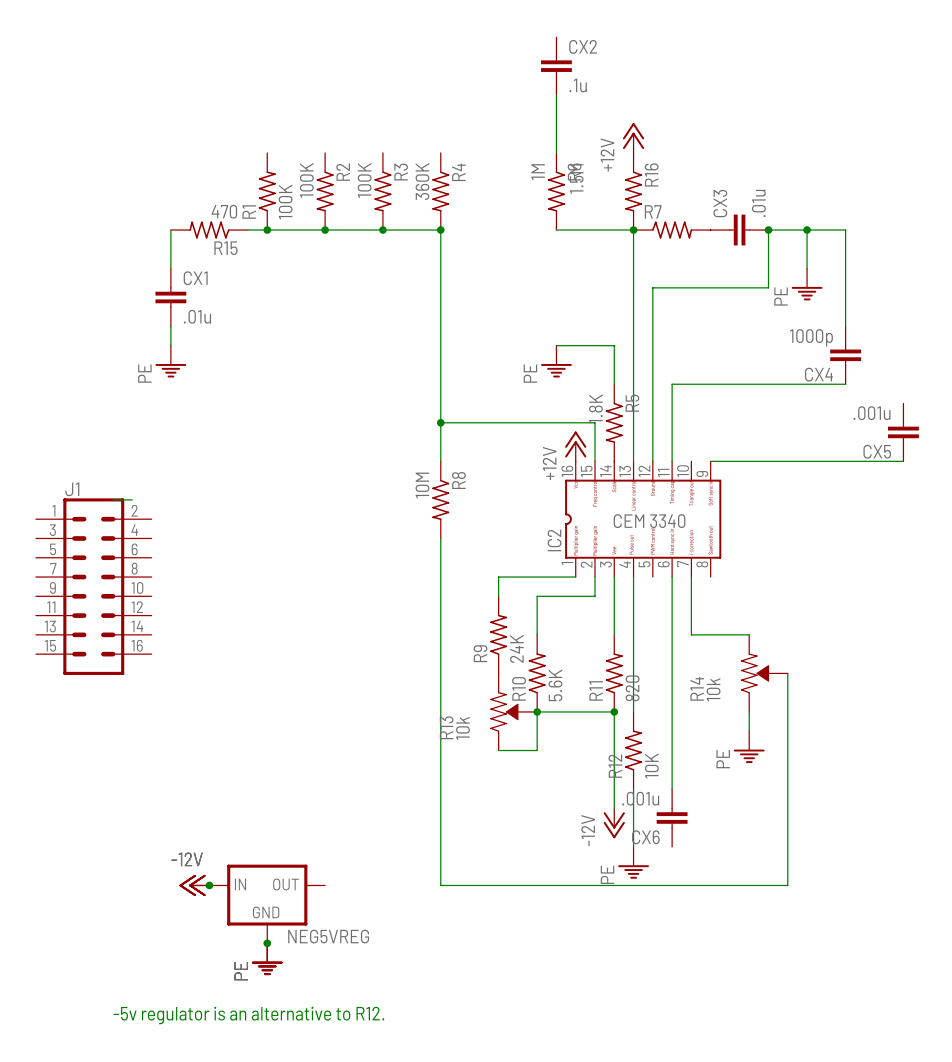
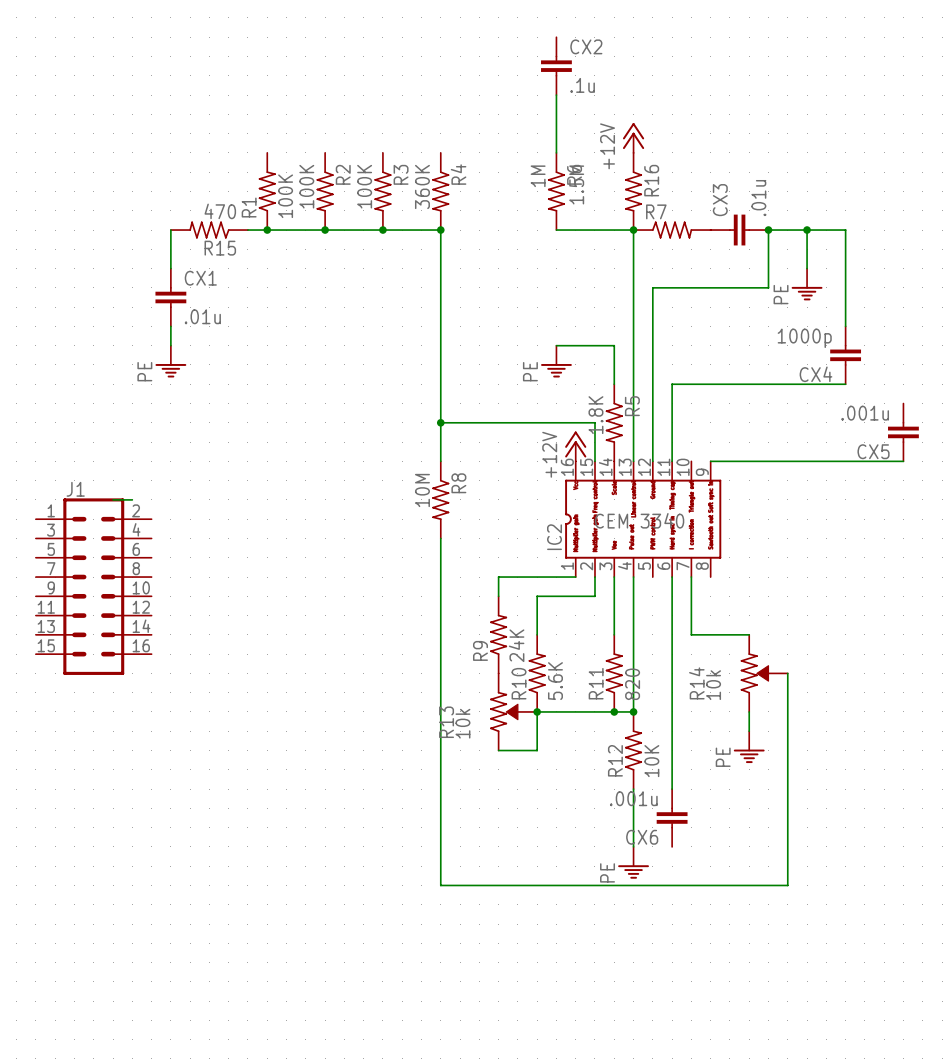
wire: (614, 711) (614, 808) -> (614, 711) (633, 711)
junction: none -> (633, 711)
power symbol: -12V (614, 823) -> none
power symbol: -12V (194, 885) -> none
junction: (209, 885) -> none
NEG5VREG: (267, 903) -> none
junction: (267, 943) -> none
power symbol: PE (267, 959) -> none
text: -5v regulator is an alternative to R12. (248, 1015) -> none

